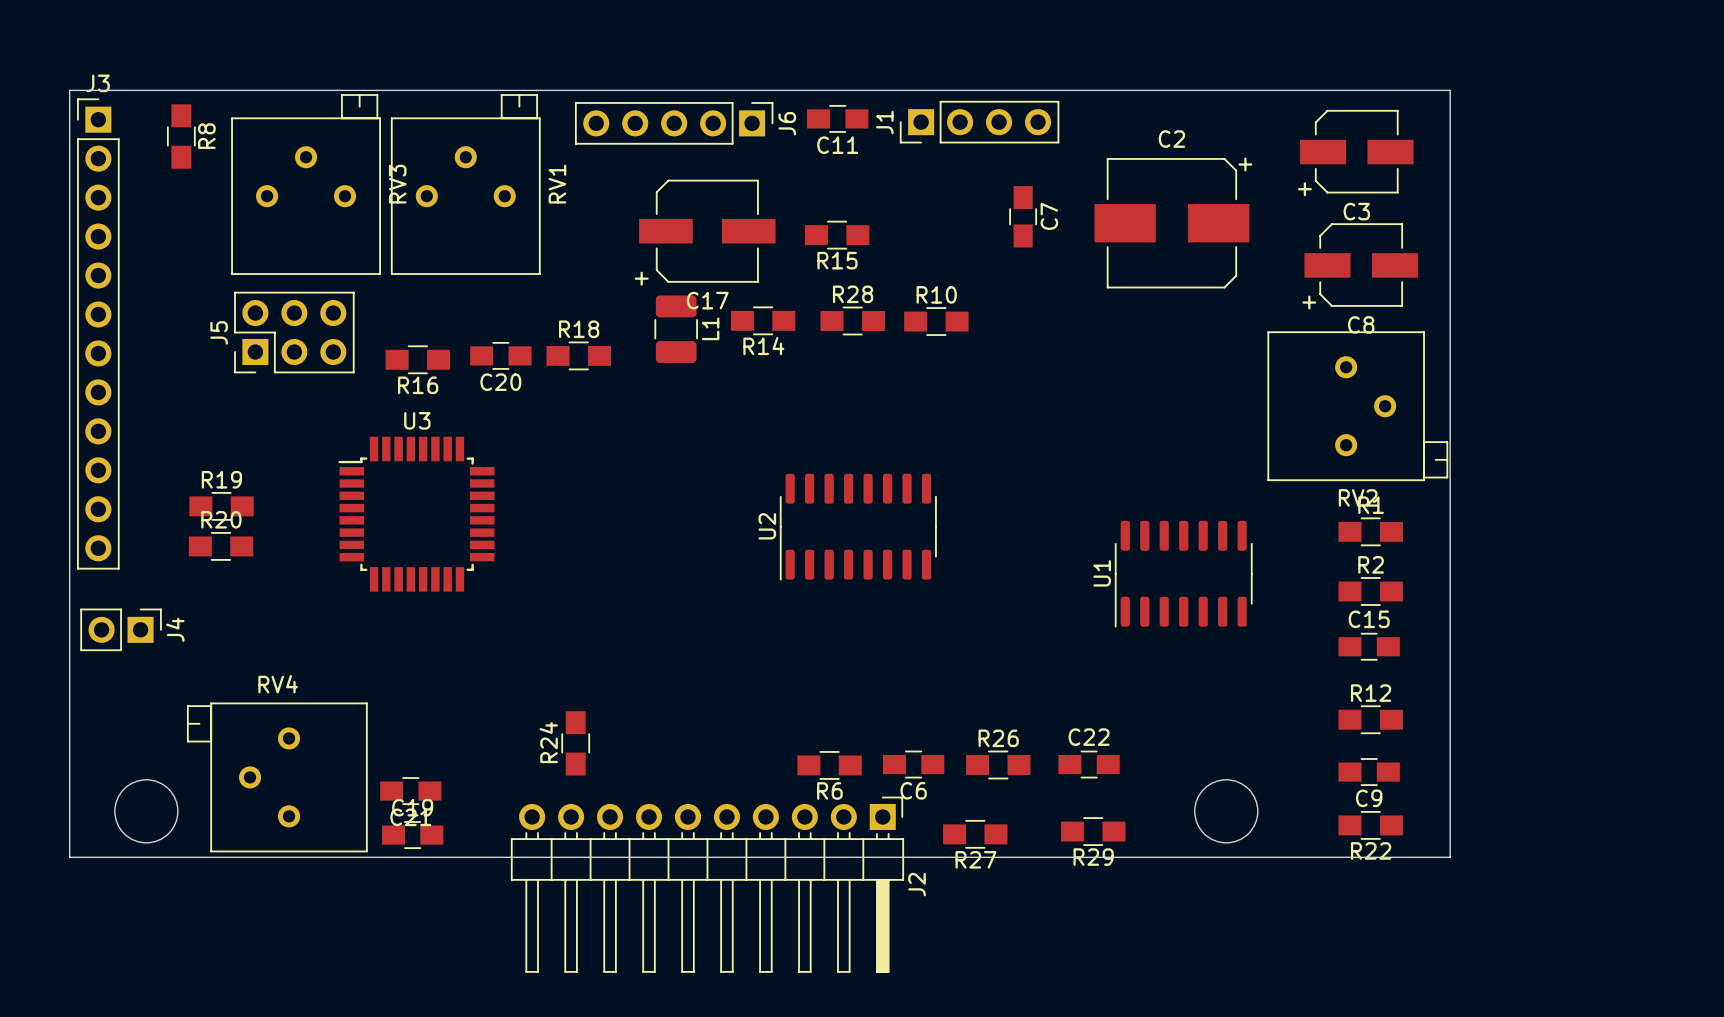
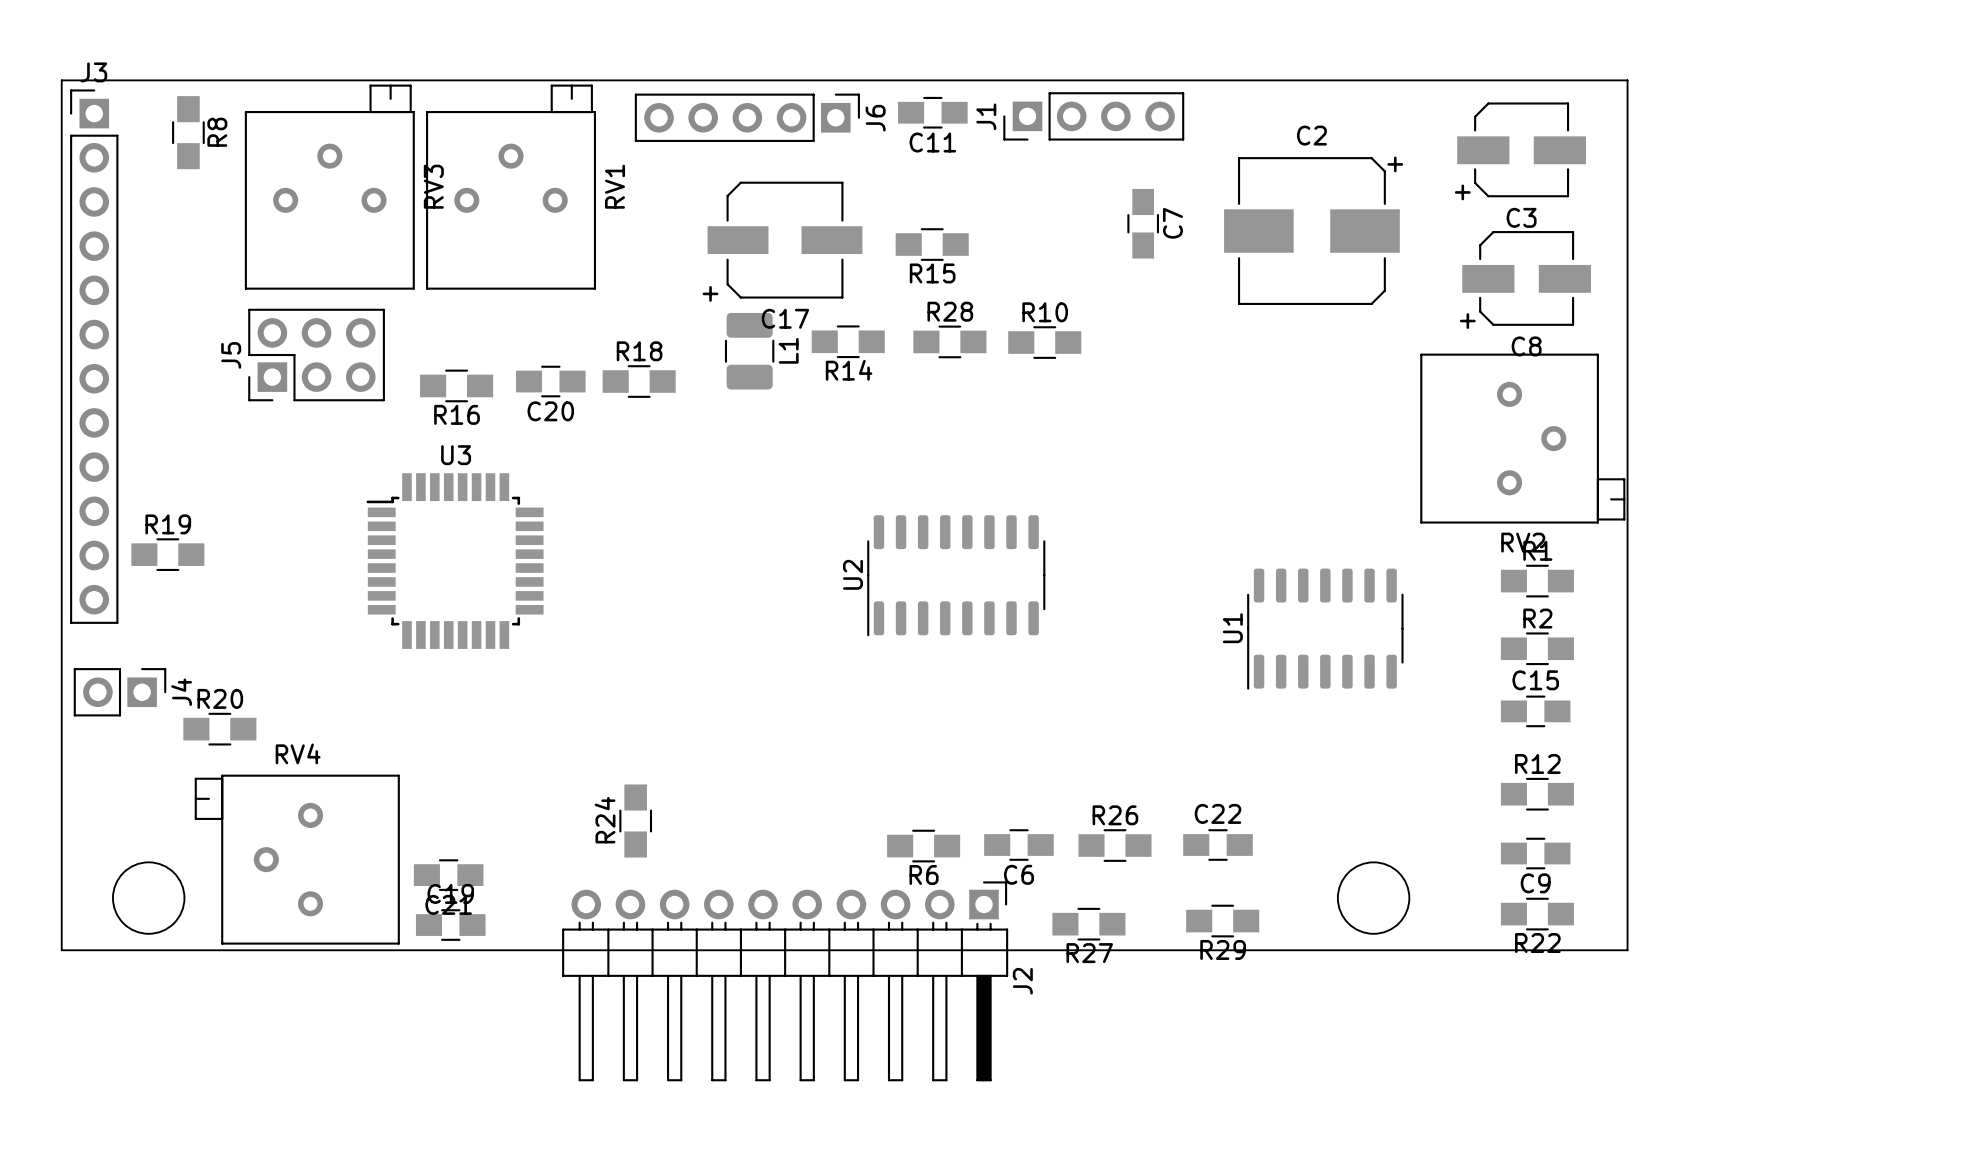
R19 position: (221, 506) -> (167, 554)
R20 position: (221, 546) -> (219, 729)

